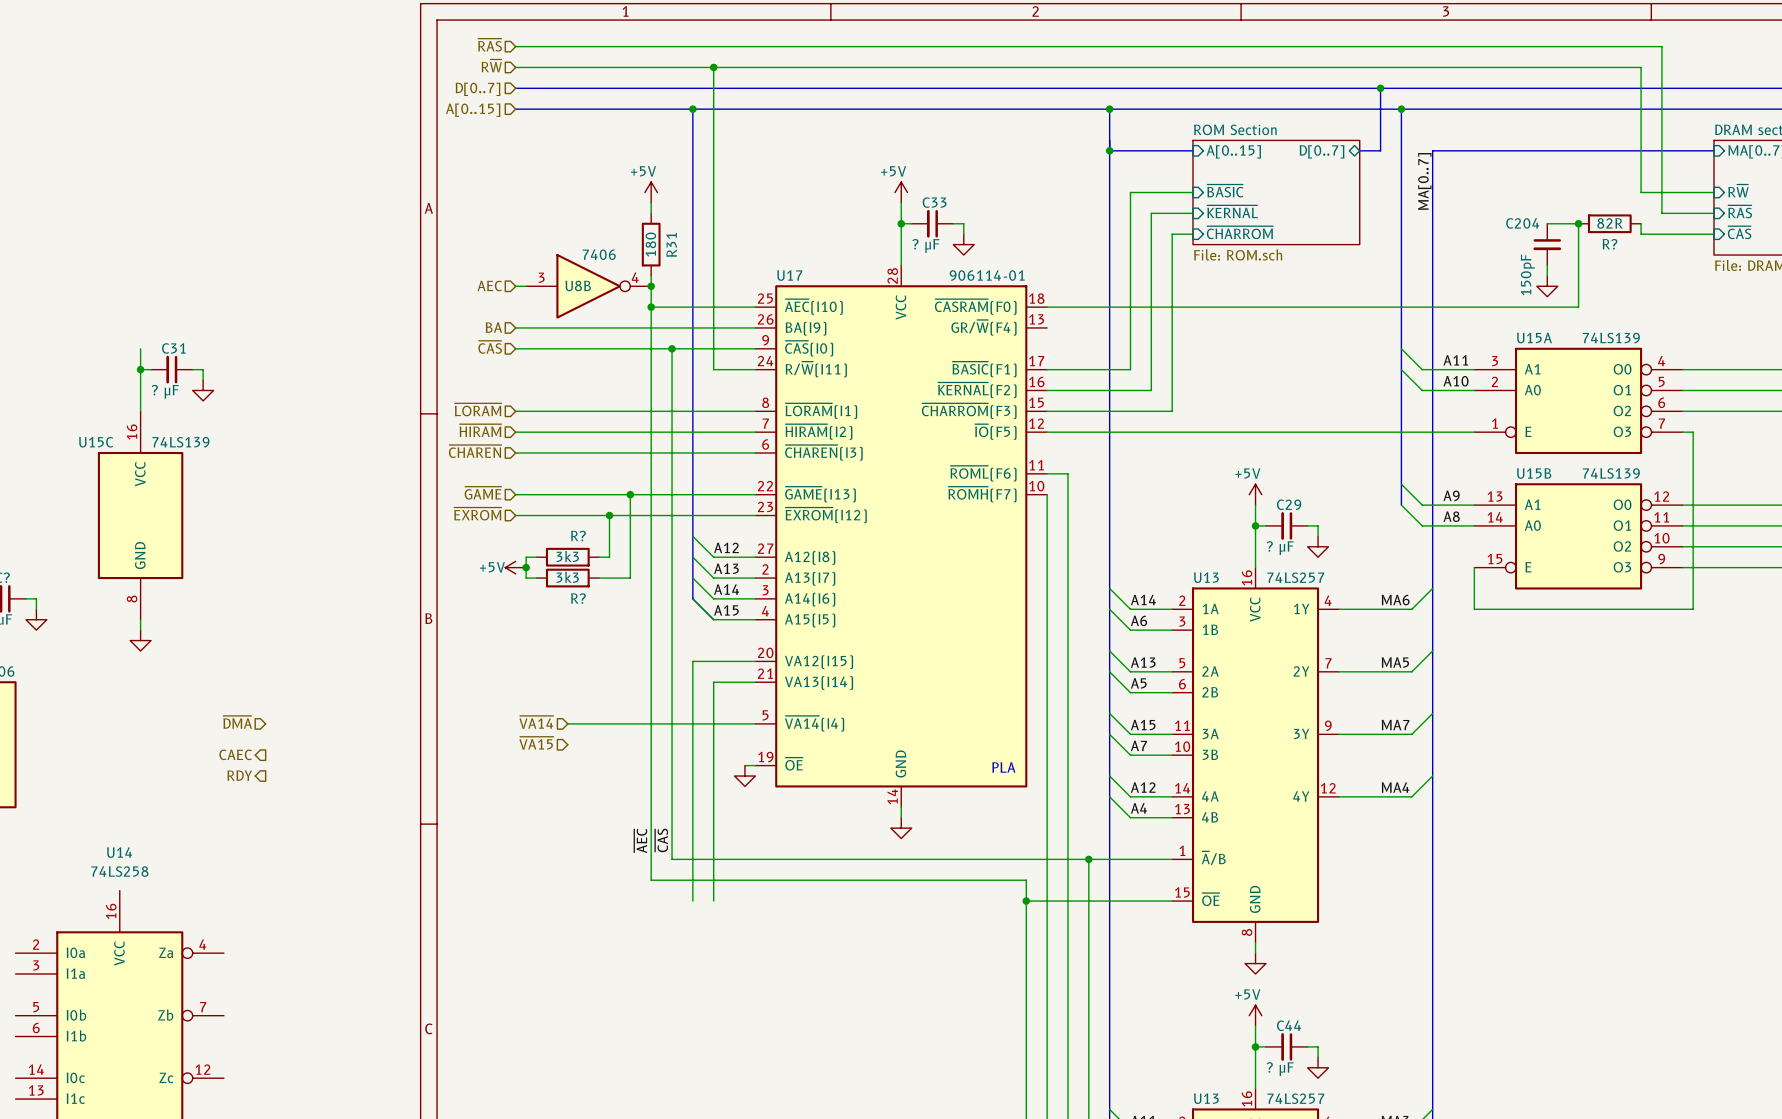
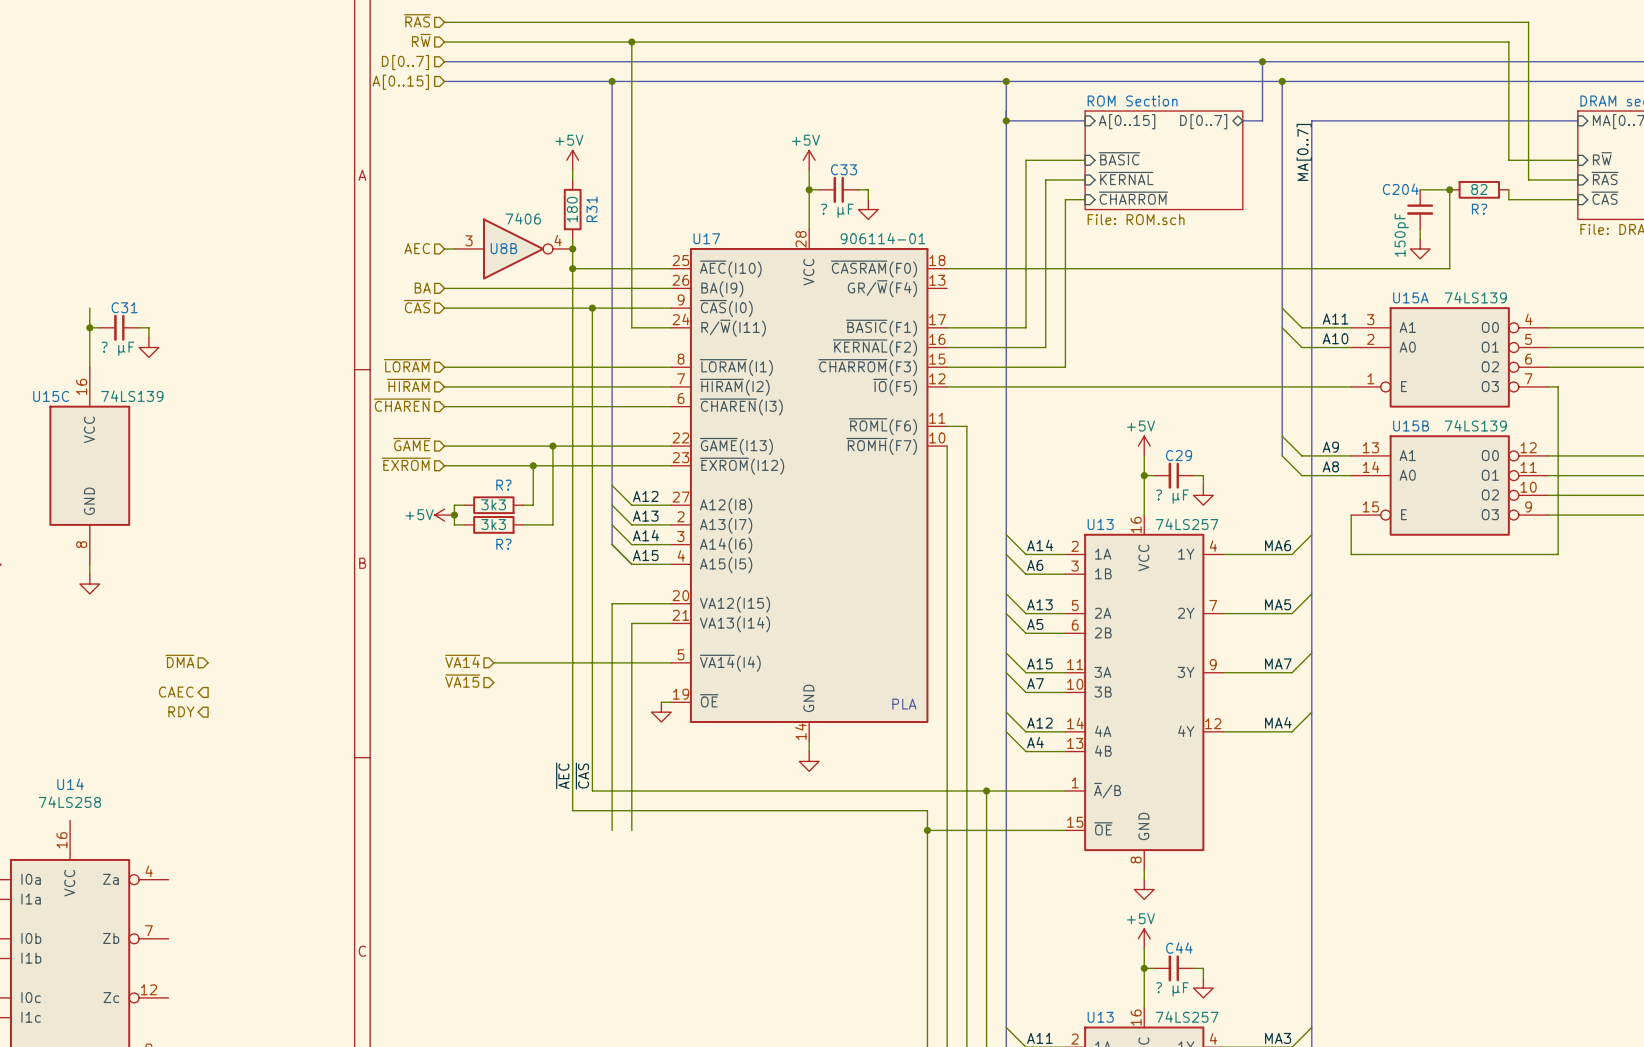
R? value: 82R (1610, 223) -> 82 (1479, 189)

